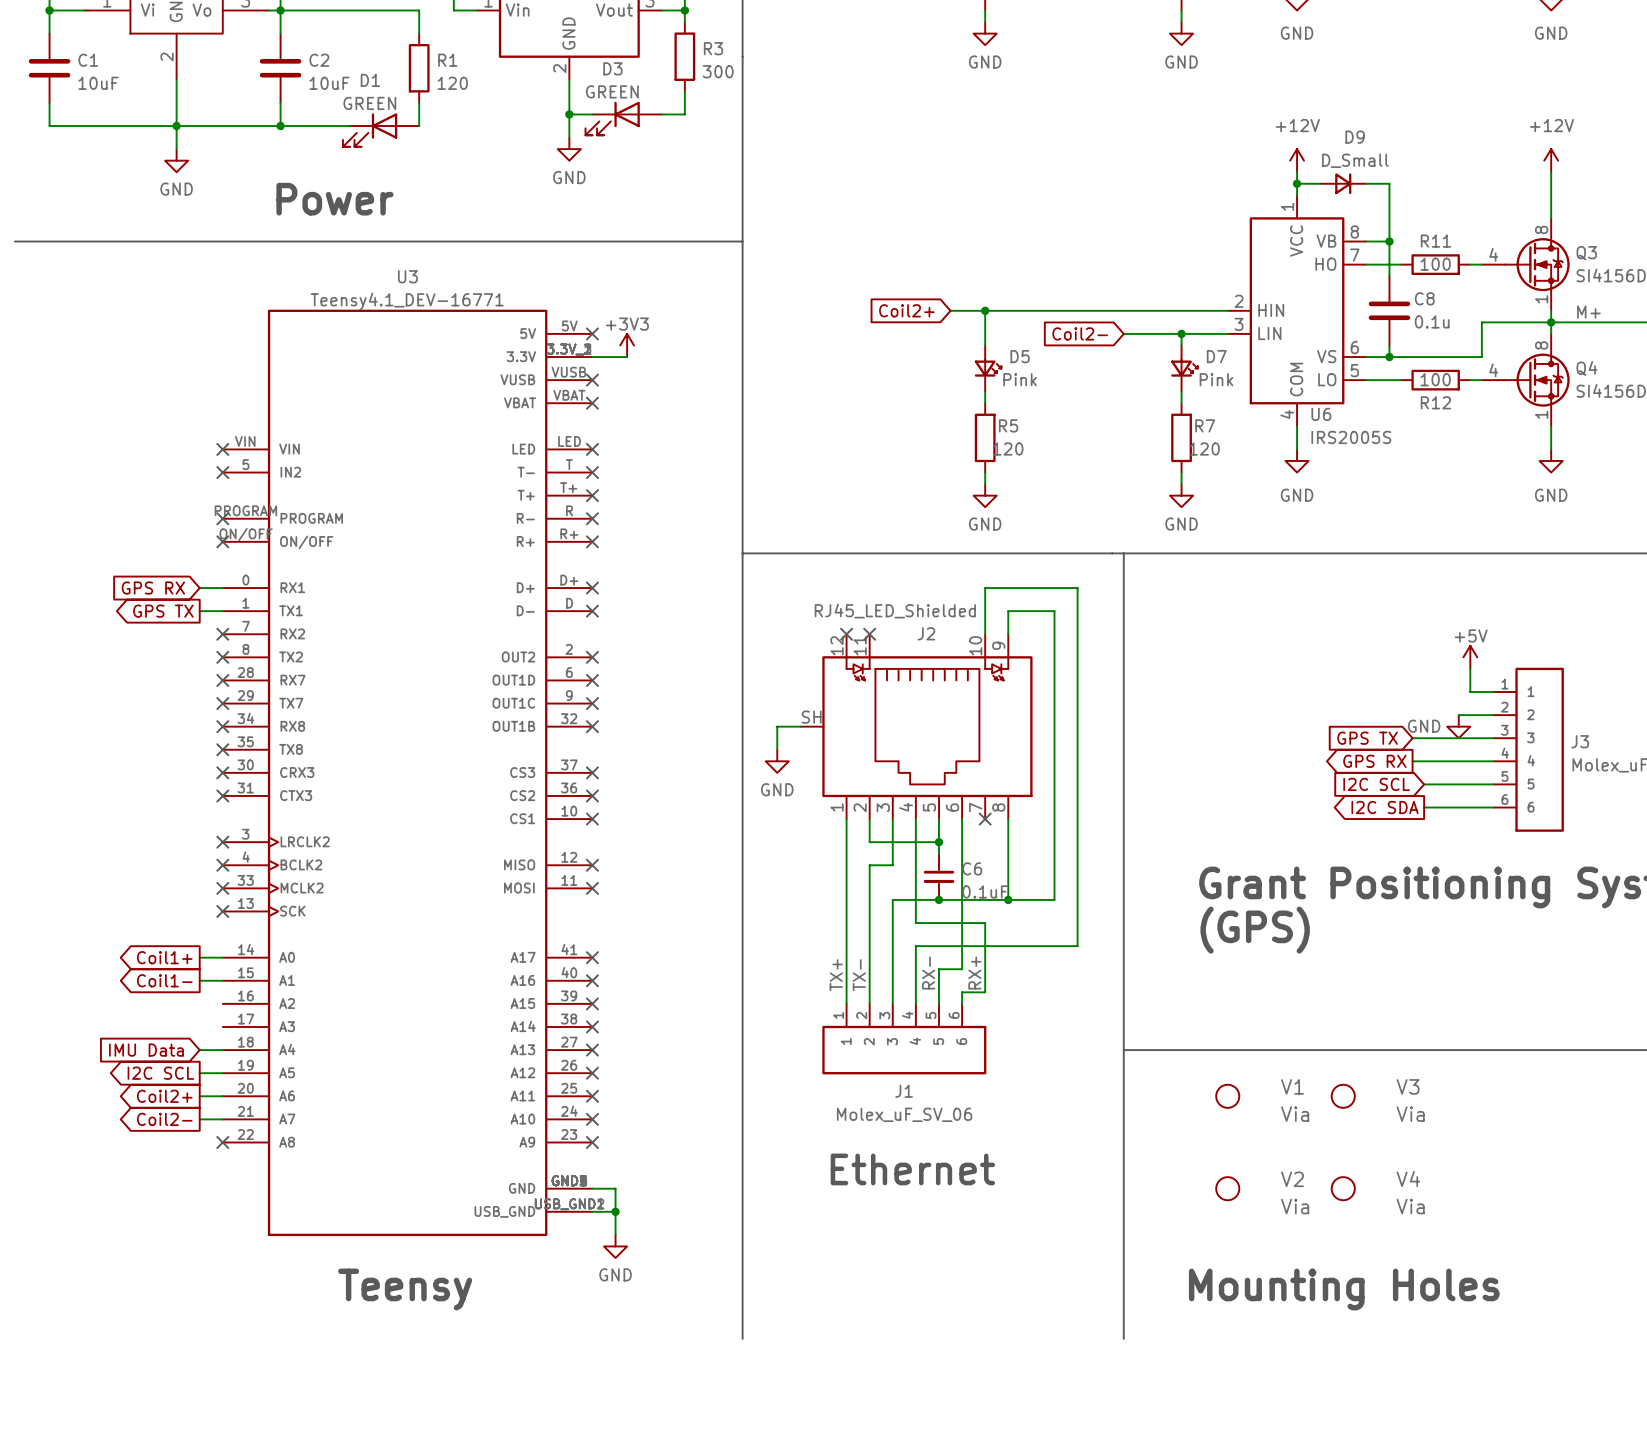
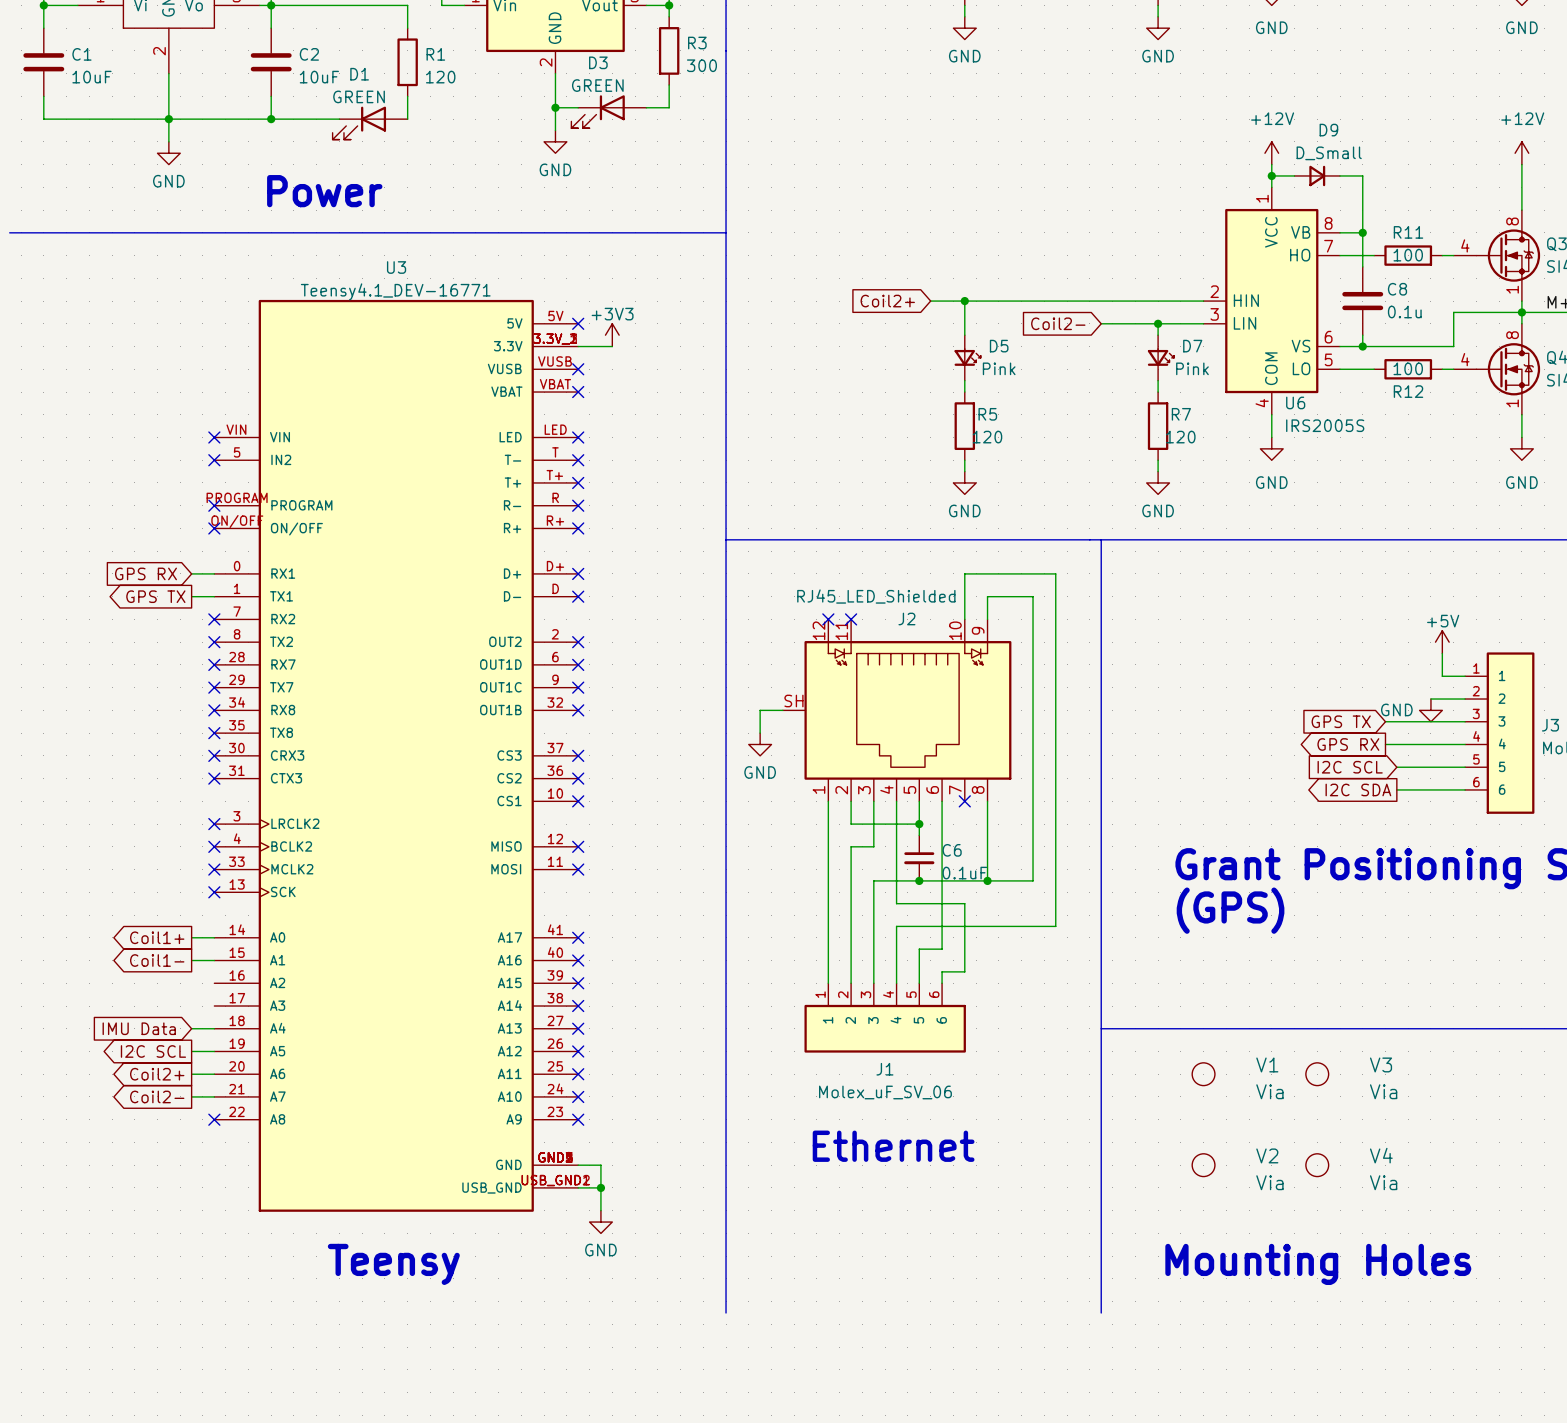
label: RX- (928, 972) -> none
label: RX+ (974, 972) -> none
label: TX+ (836, 975) -> none
label: TX- (859, 975) -> none

